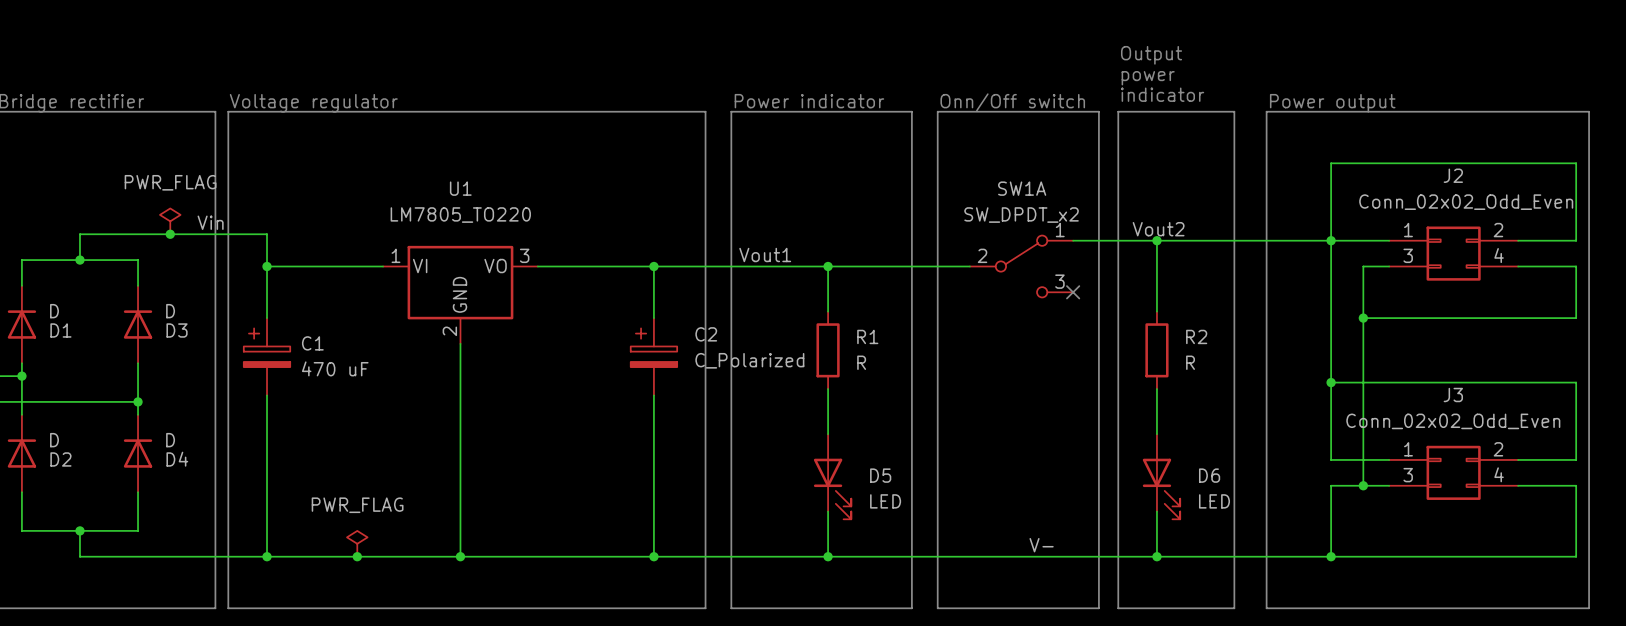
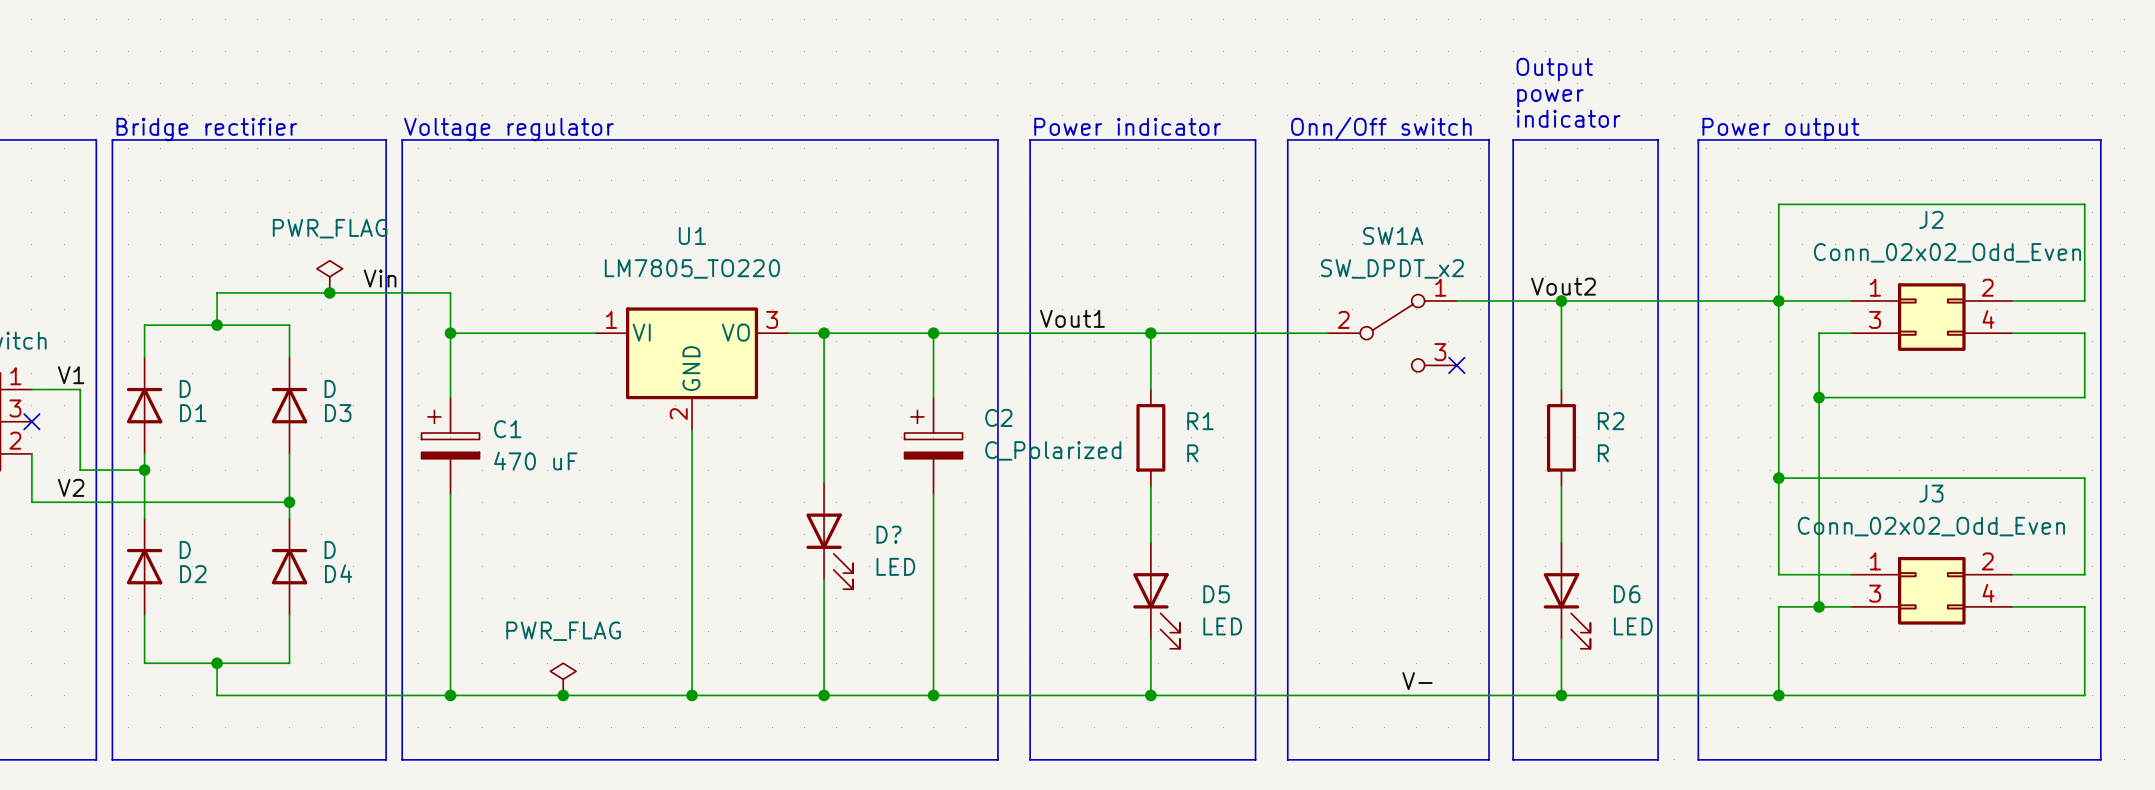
wire: none -> (824, 333) (824, 482)
junction: none -> (824, 333)
D?: none -> LED (829, 536)
wire: none -> (824, 579) (824, 695)
junction: none -> (824, 695)

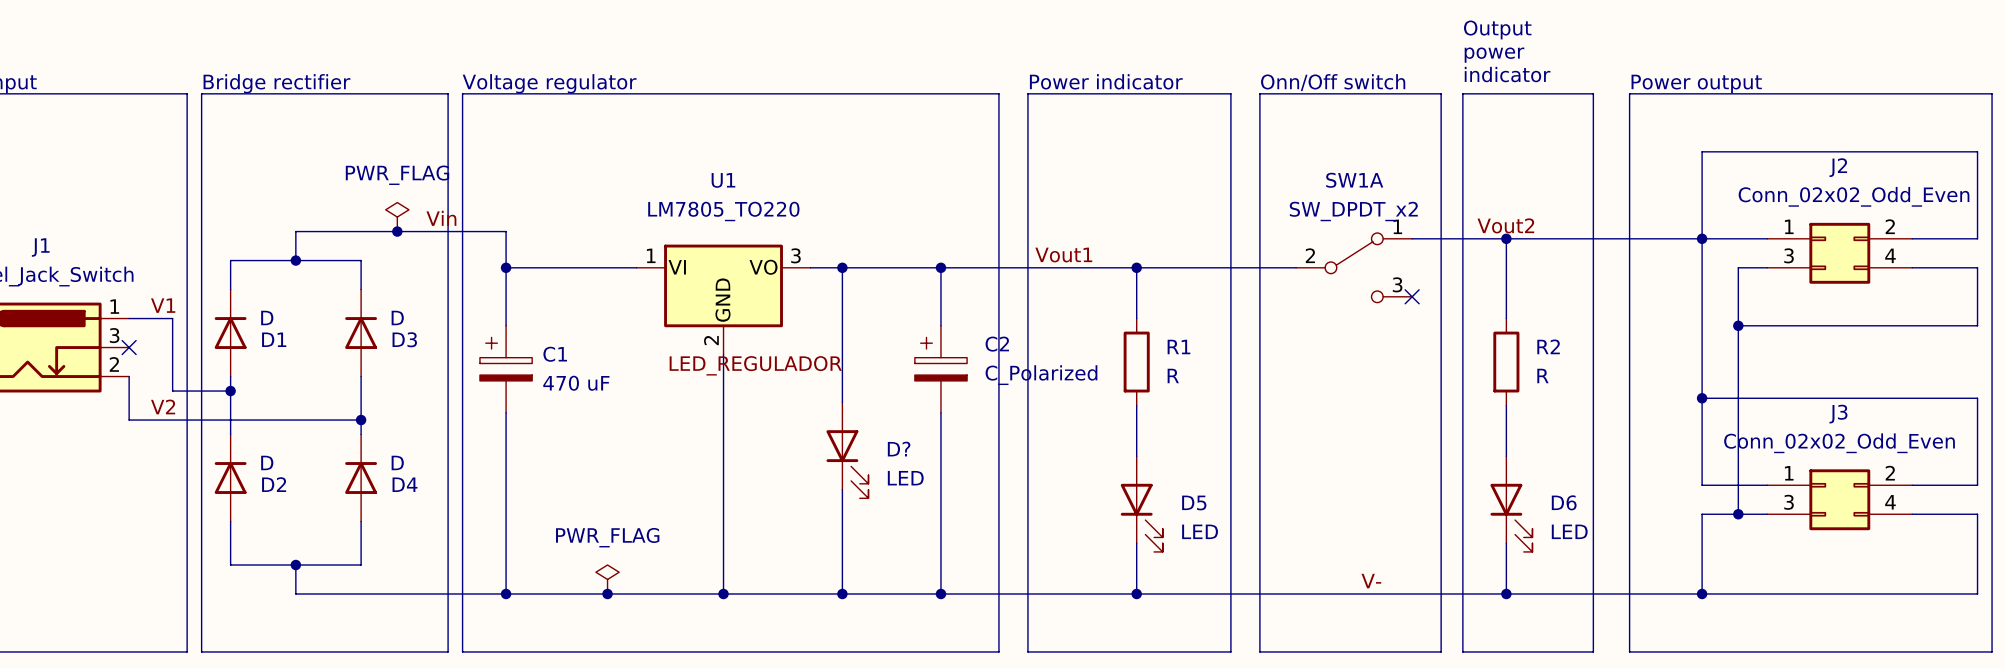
label: none -> LED_REGULADOR (755, 365)

